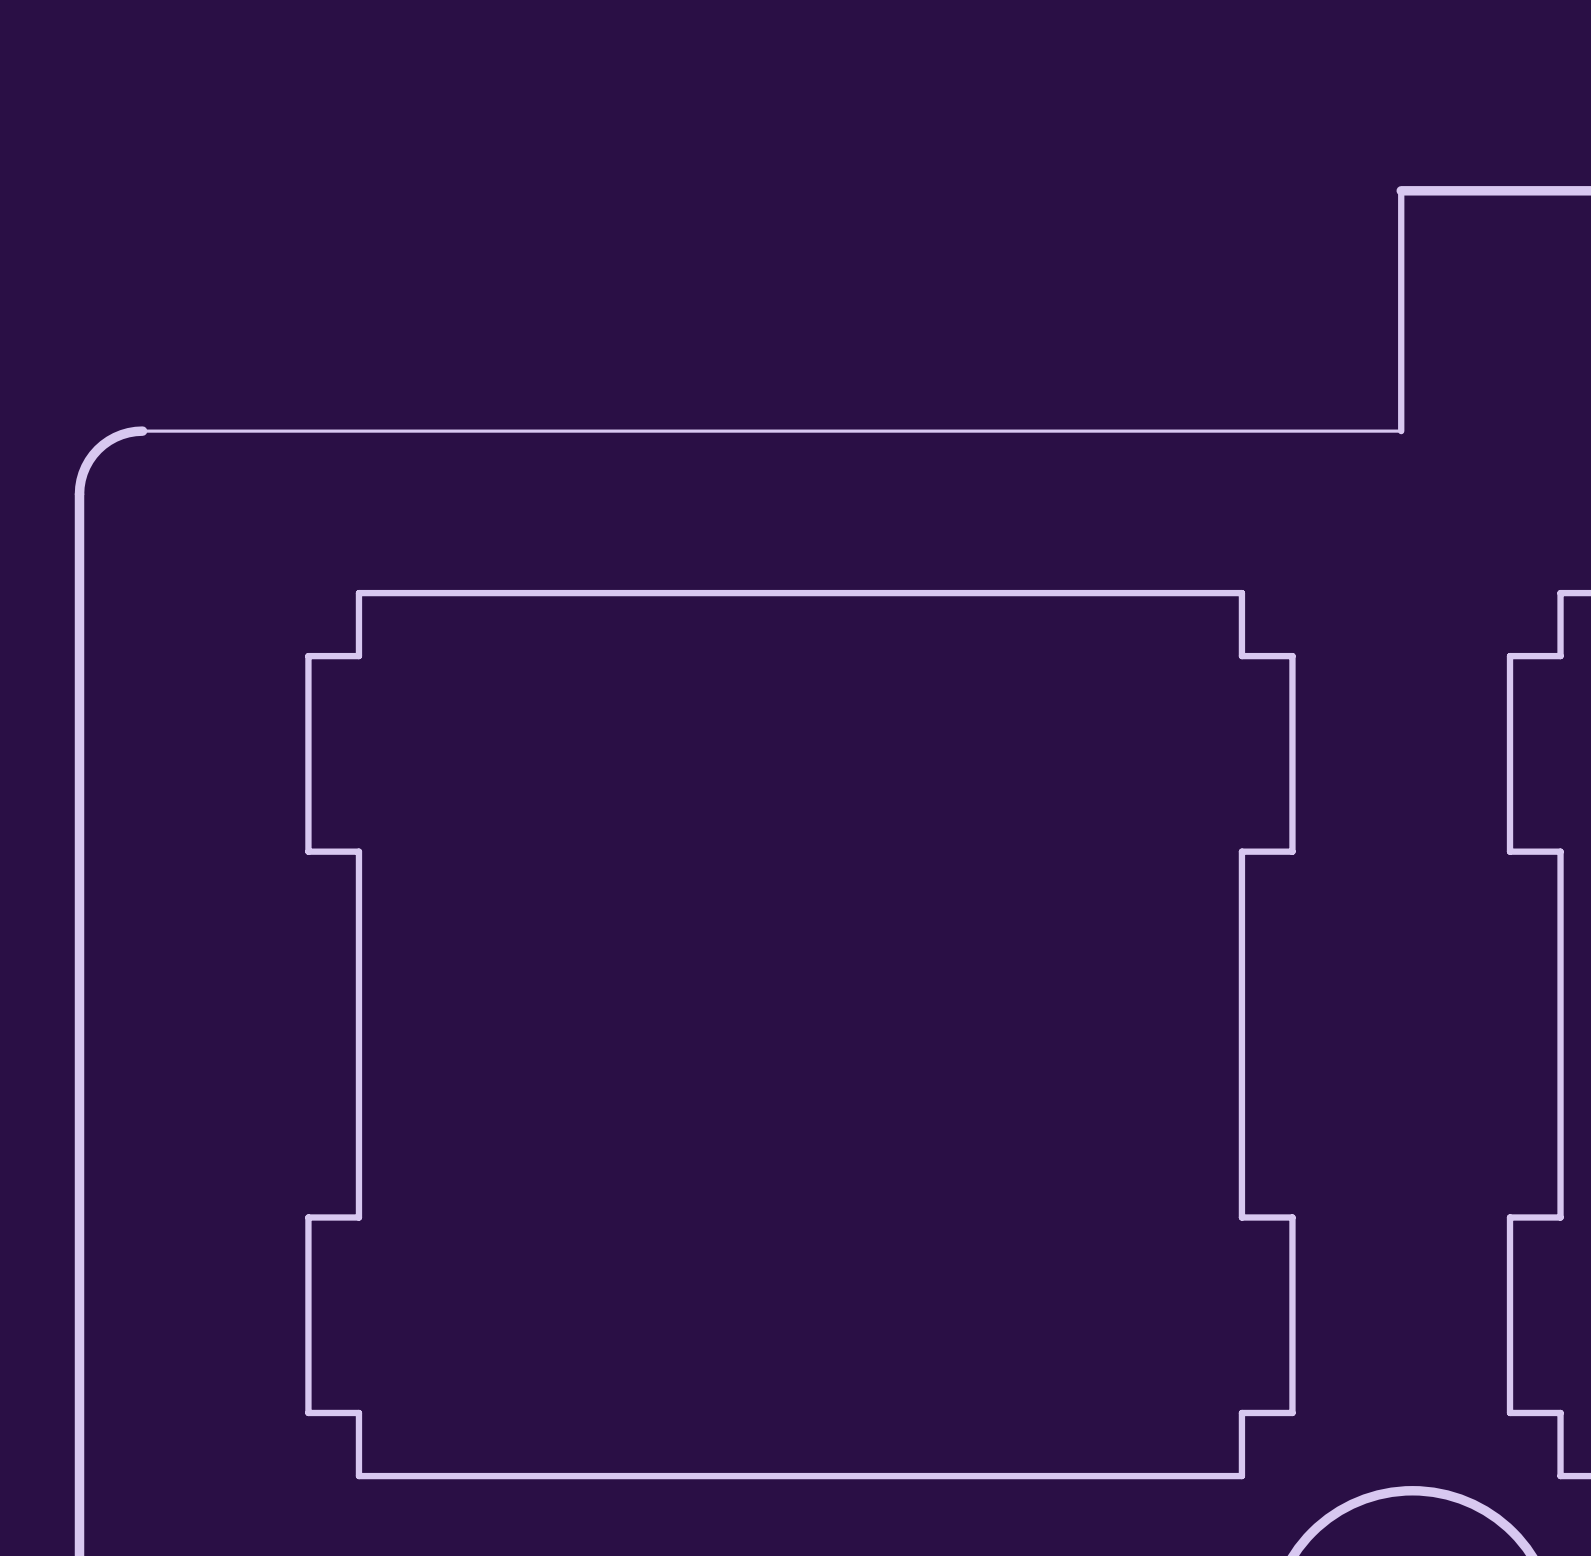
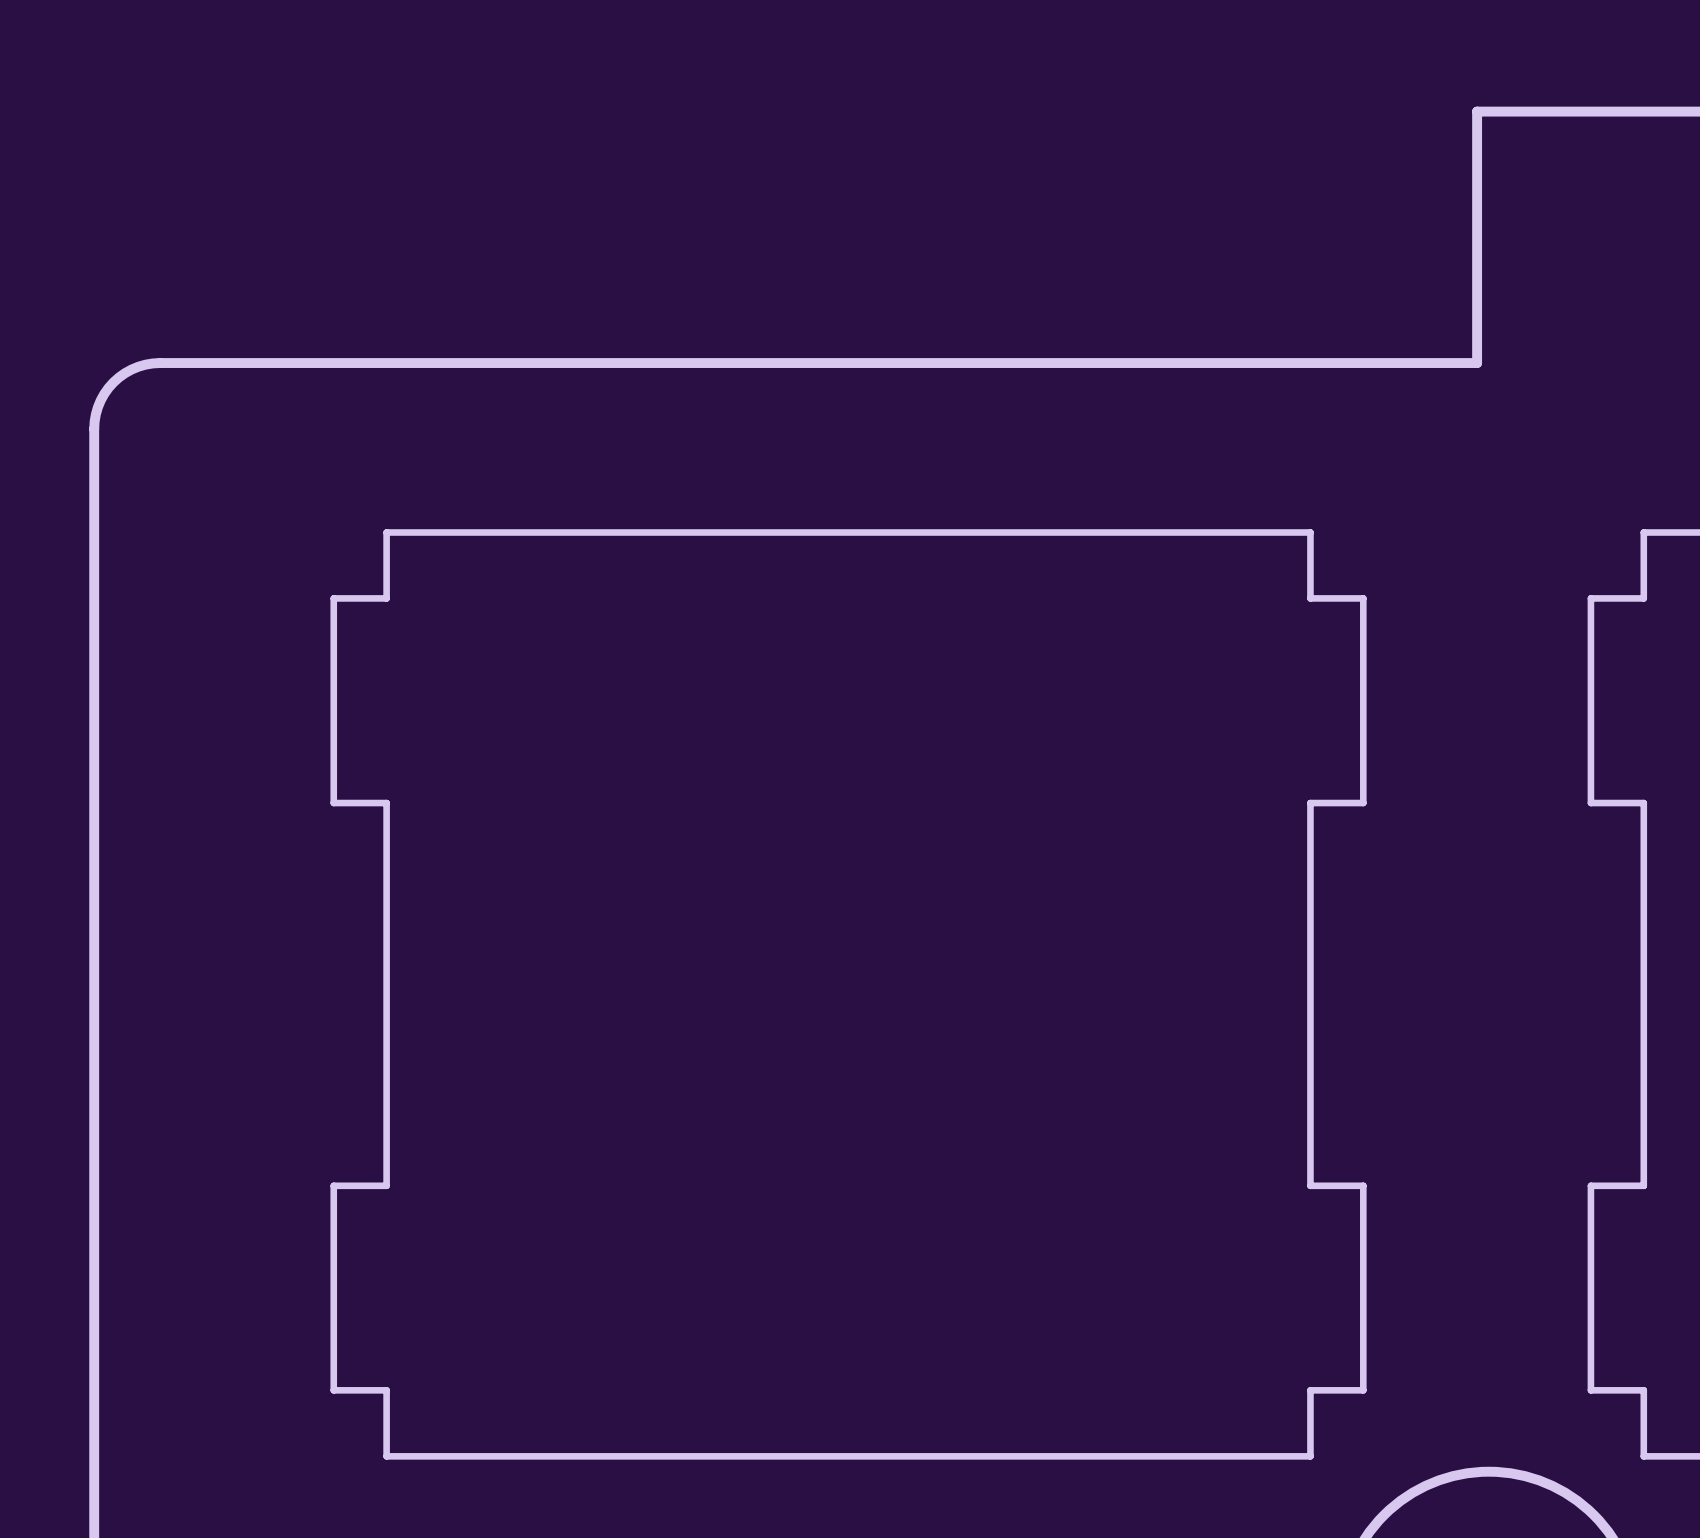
board edge width: thin (1401, 190) (1401, 431) (142, 431) -> thick (1477, 111) (1477, 363) (160, 363)

